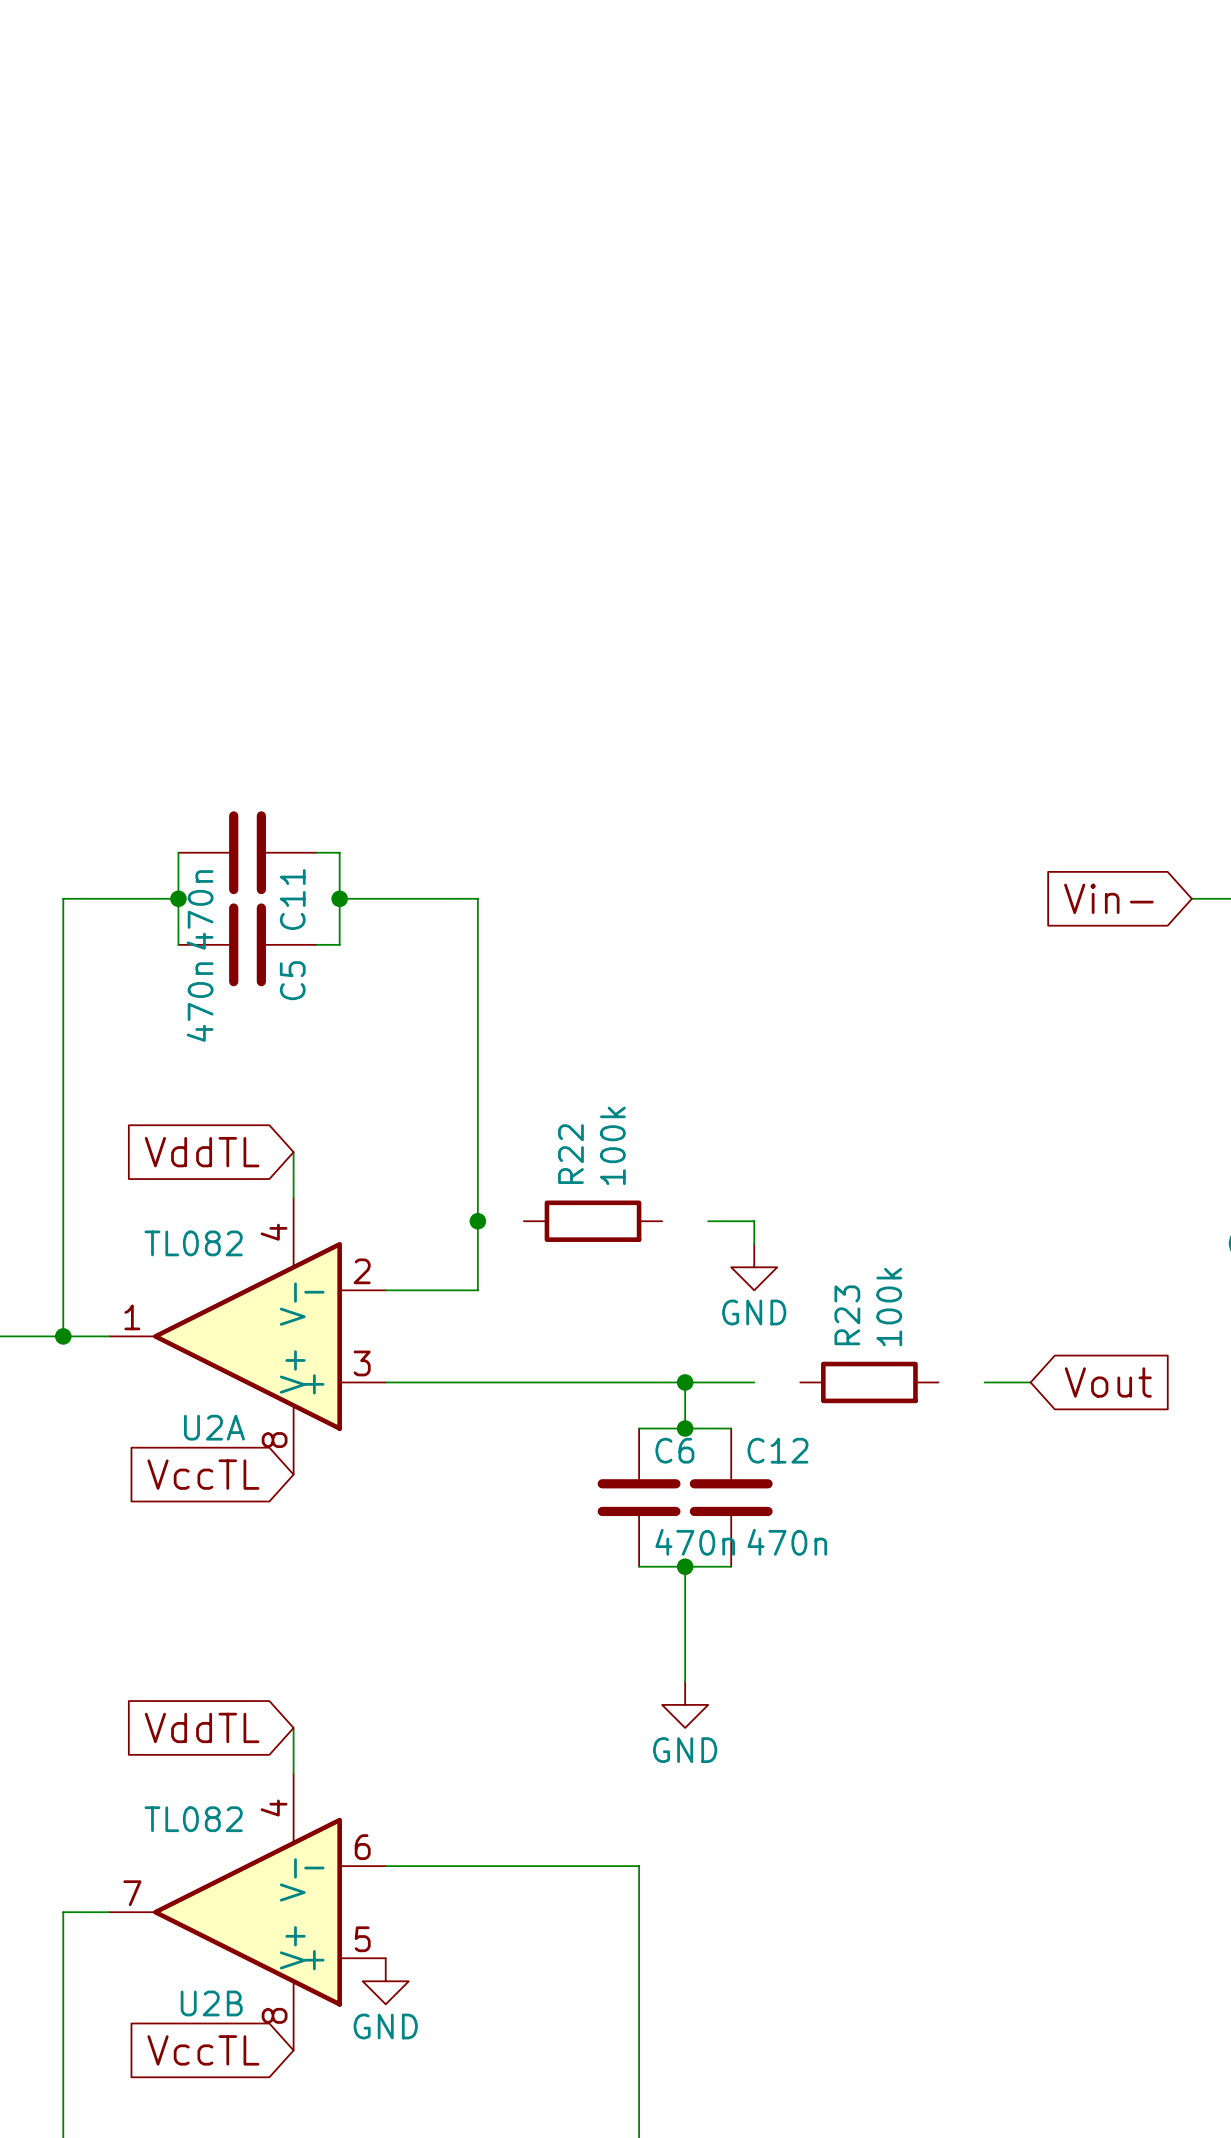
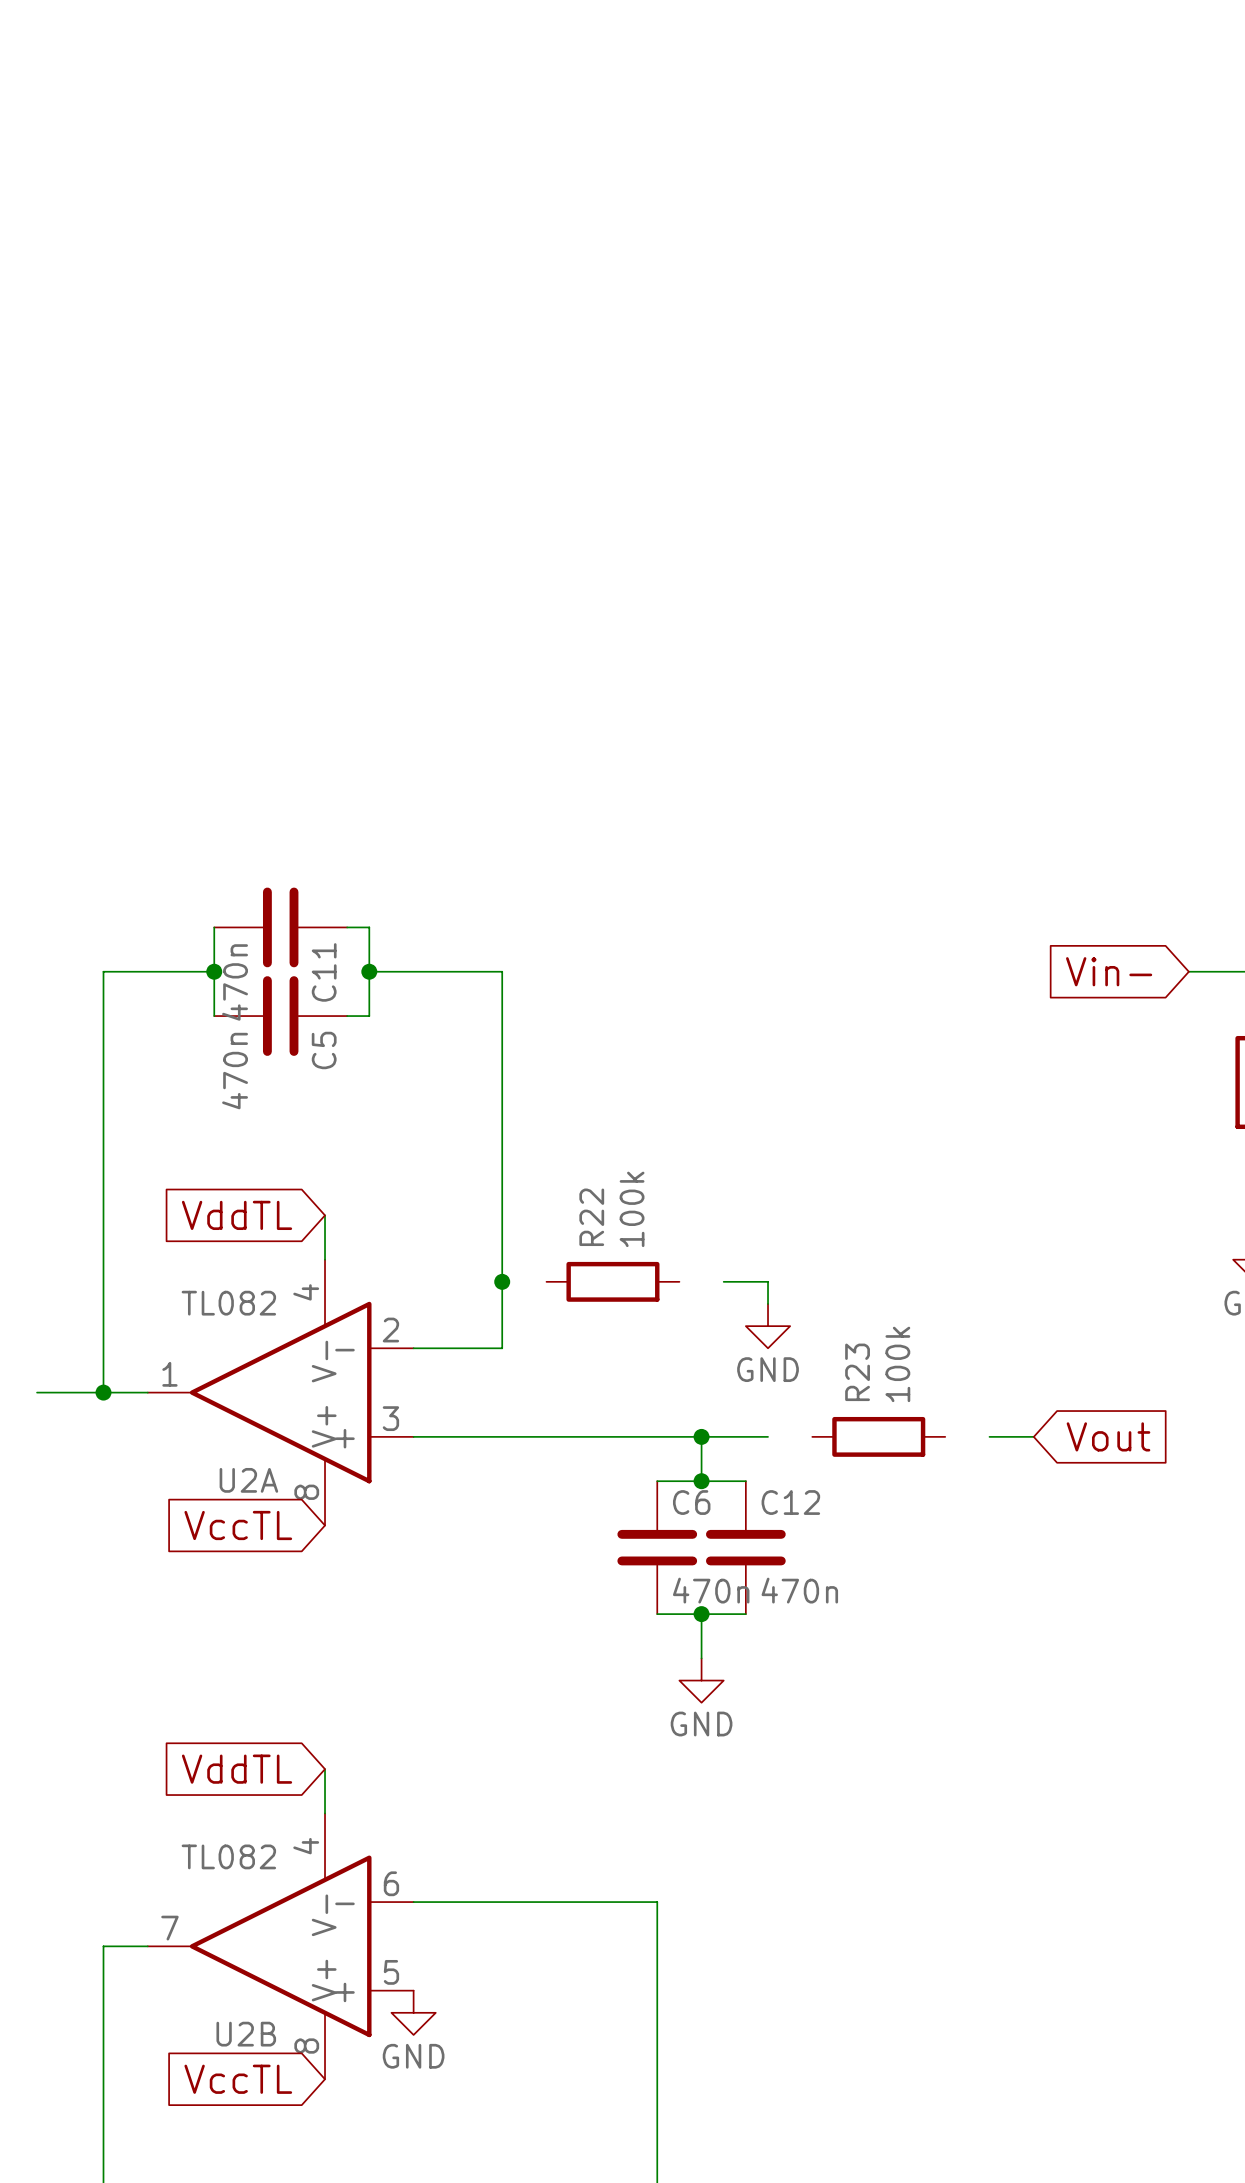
wire: (685, 1612) (685, 1681) -> none
power symbol position: GND (685, 1704) -> GND (701, 1680)

